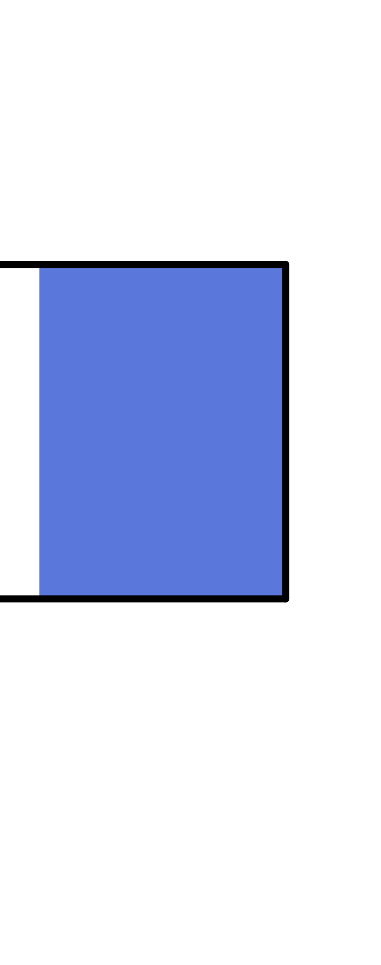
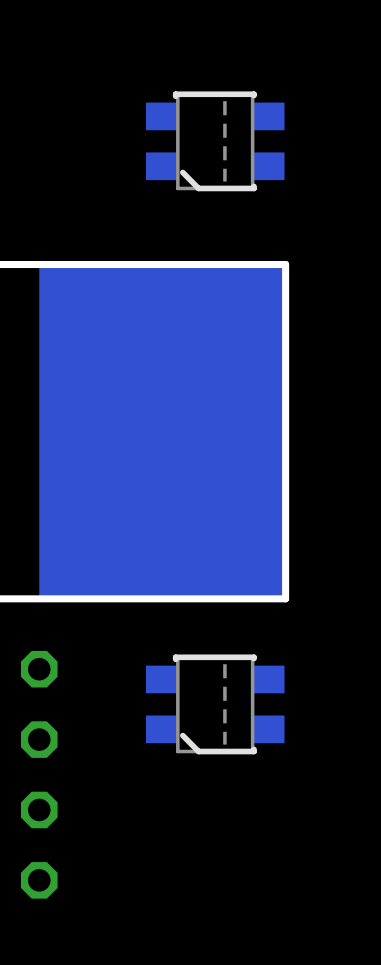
part: none -> (215, 141)
part: none -> (39, 704)
part: none -> (215, 704)
part: none -> (39, 845)

